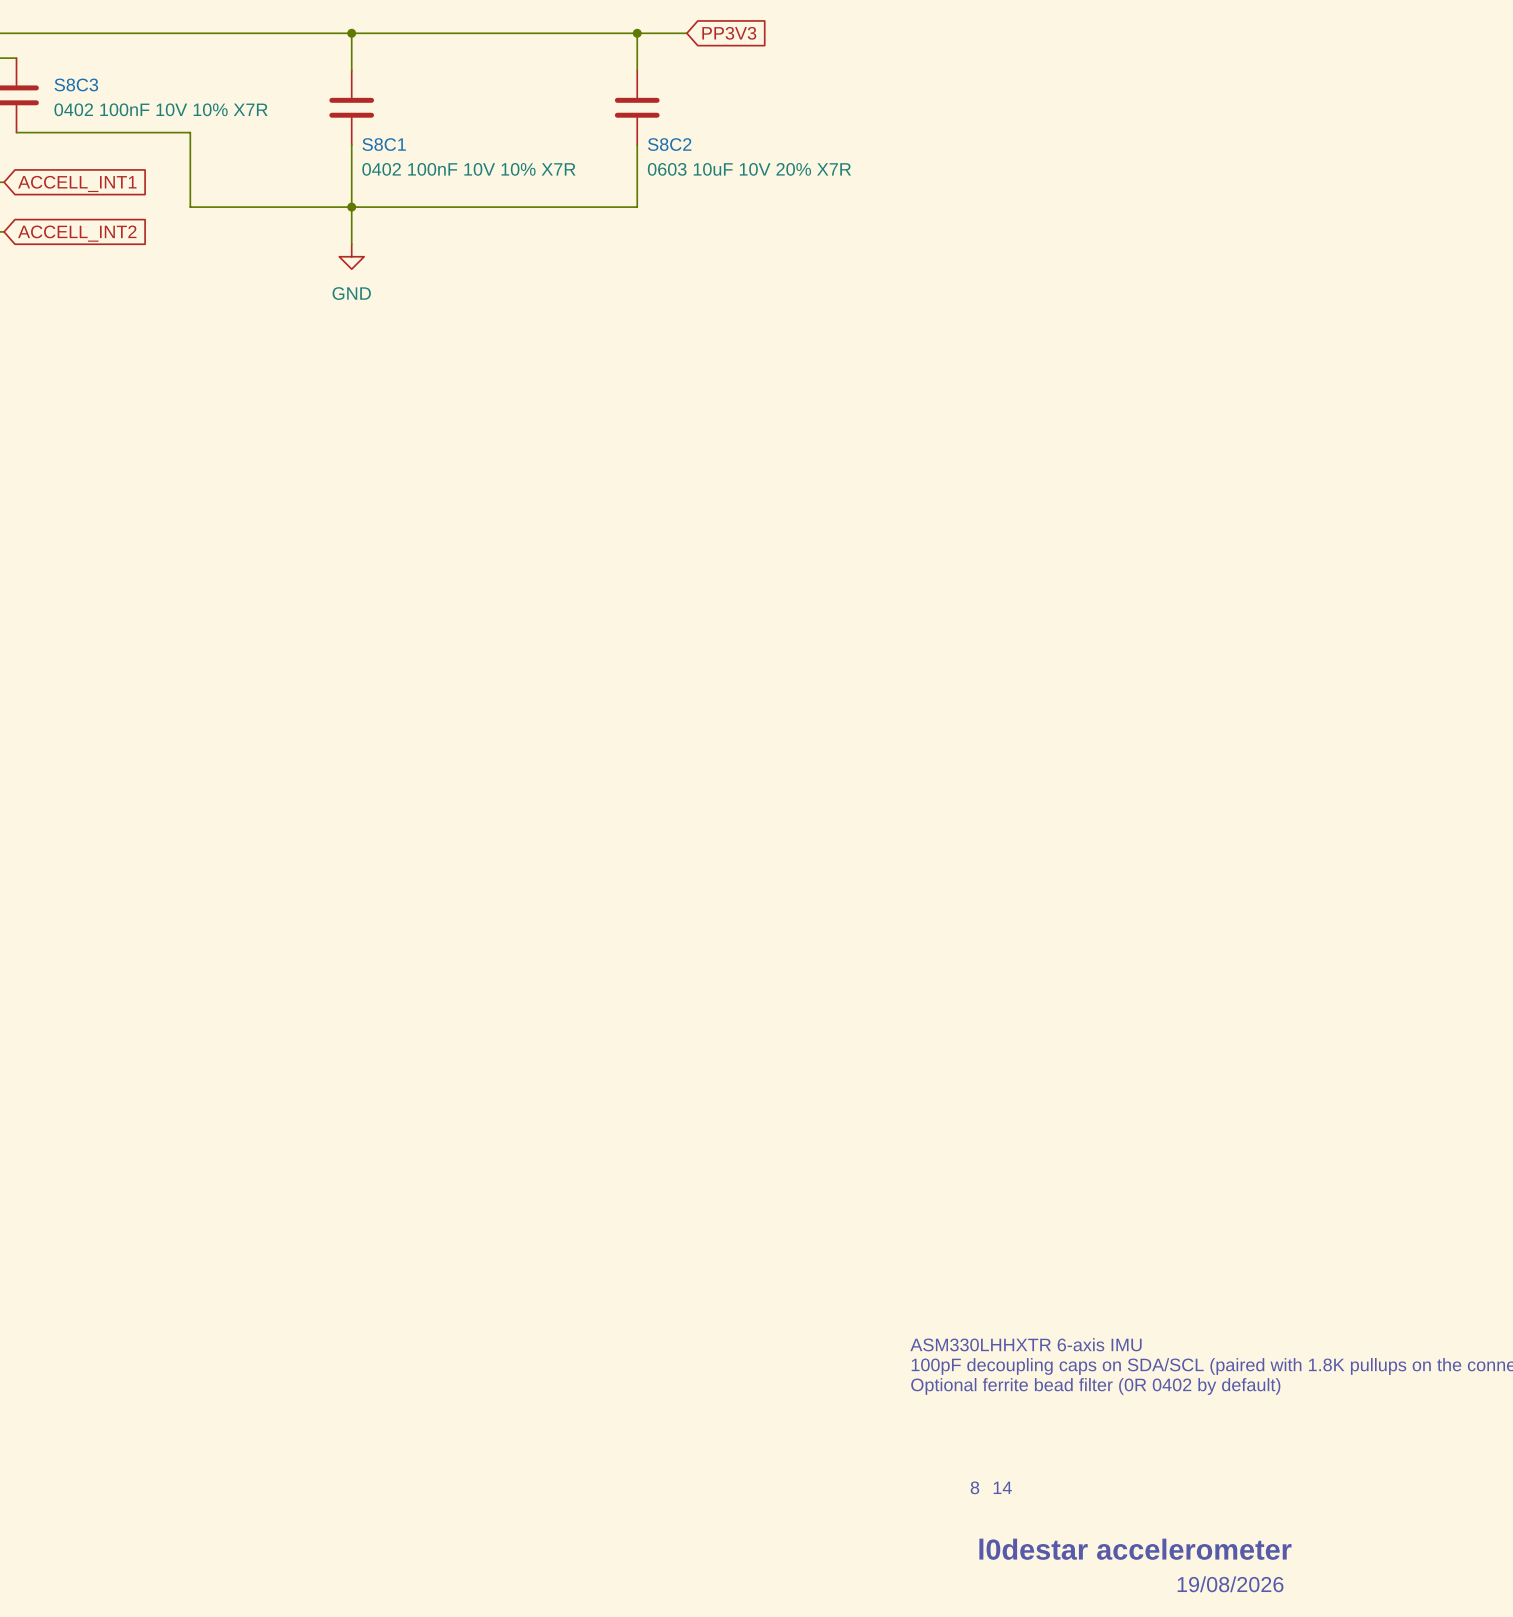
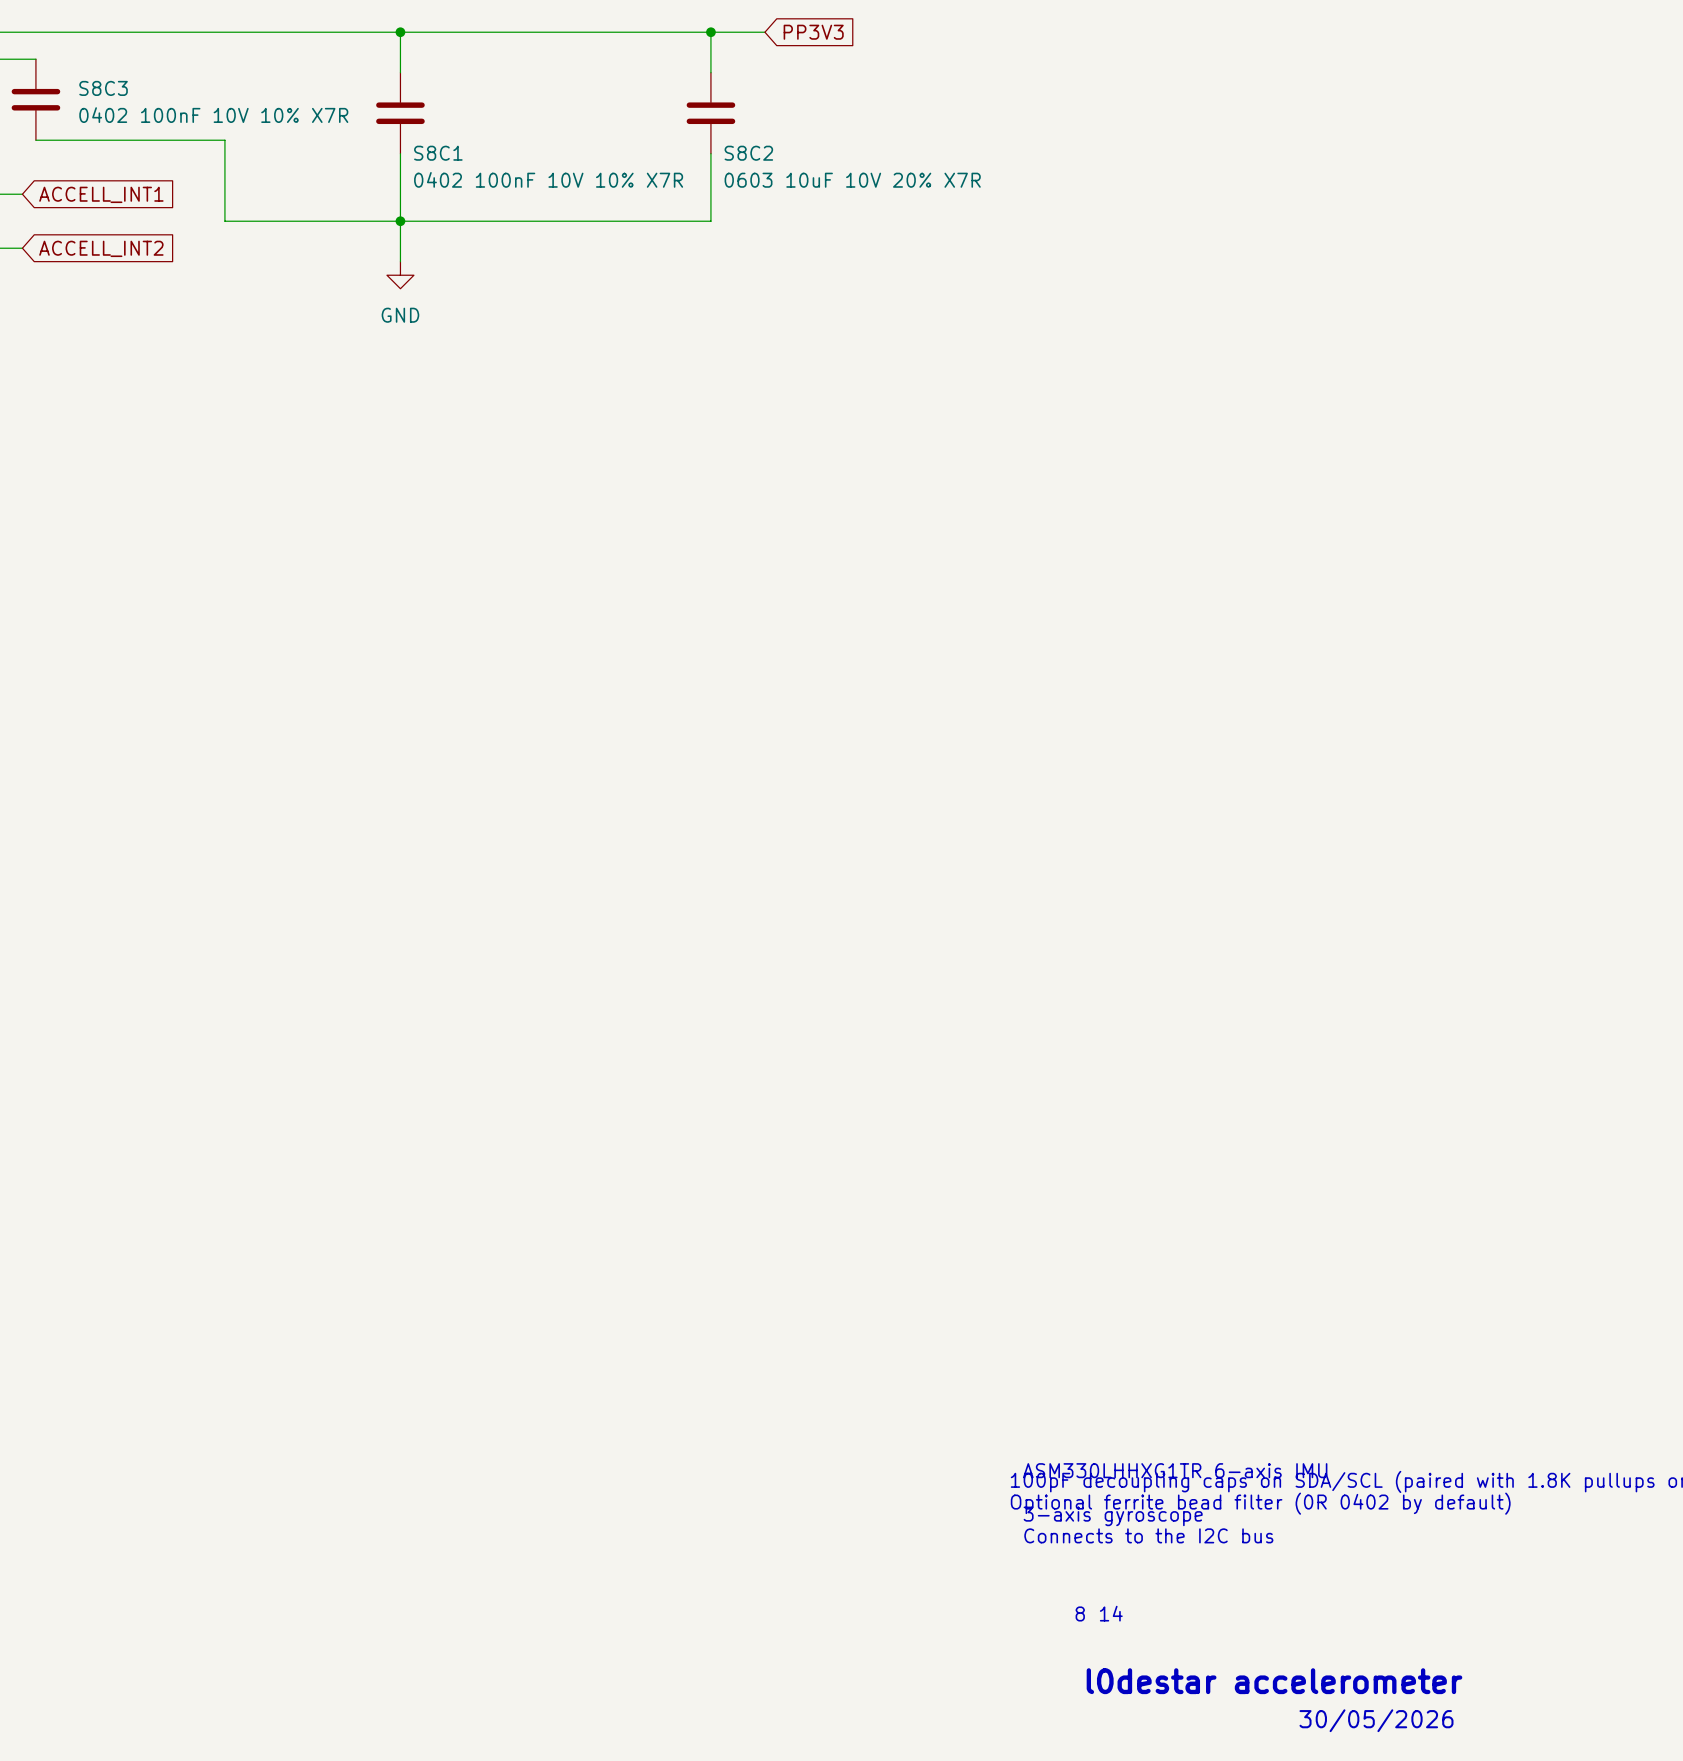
text: ASM330LHHXTR 6-axis IMU (1026, 1344) -> ASM330LHHXG1TR 6-axis IMU (1175, 1470)
text: none -> 3-axis gyroscope (1113, 1516)
text: none -> Connects to the I2C bus (1148, 1535)
text: 19/08/2026 (1230, 1584) -> 30/05/2026 (1376, 1720)

